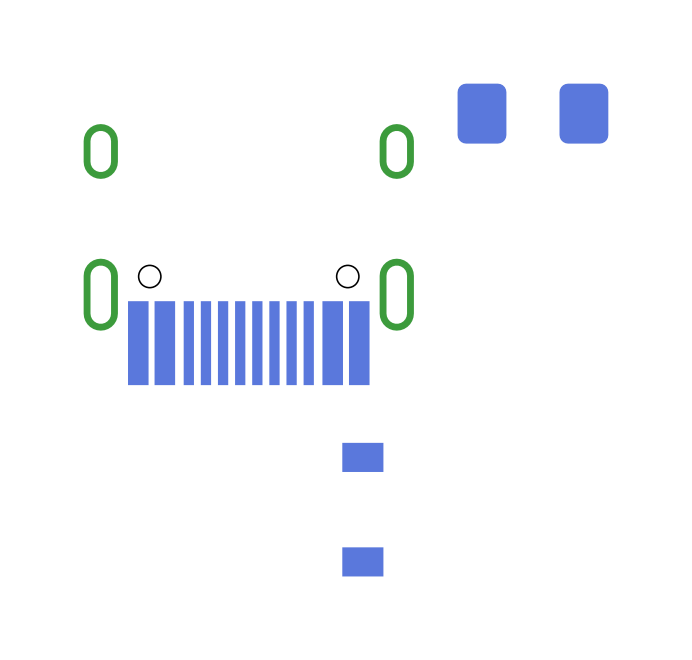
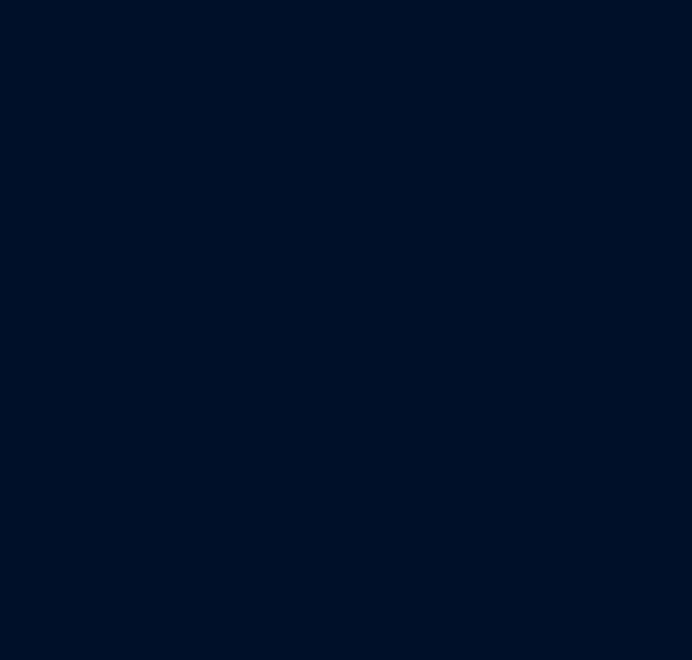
part: (532, 113) -> none
part: (248, 254) -> none
part: (362, 509) -> none

